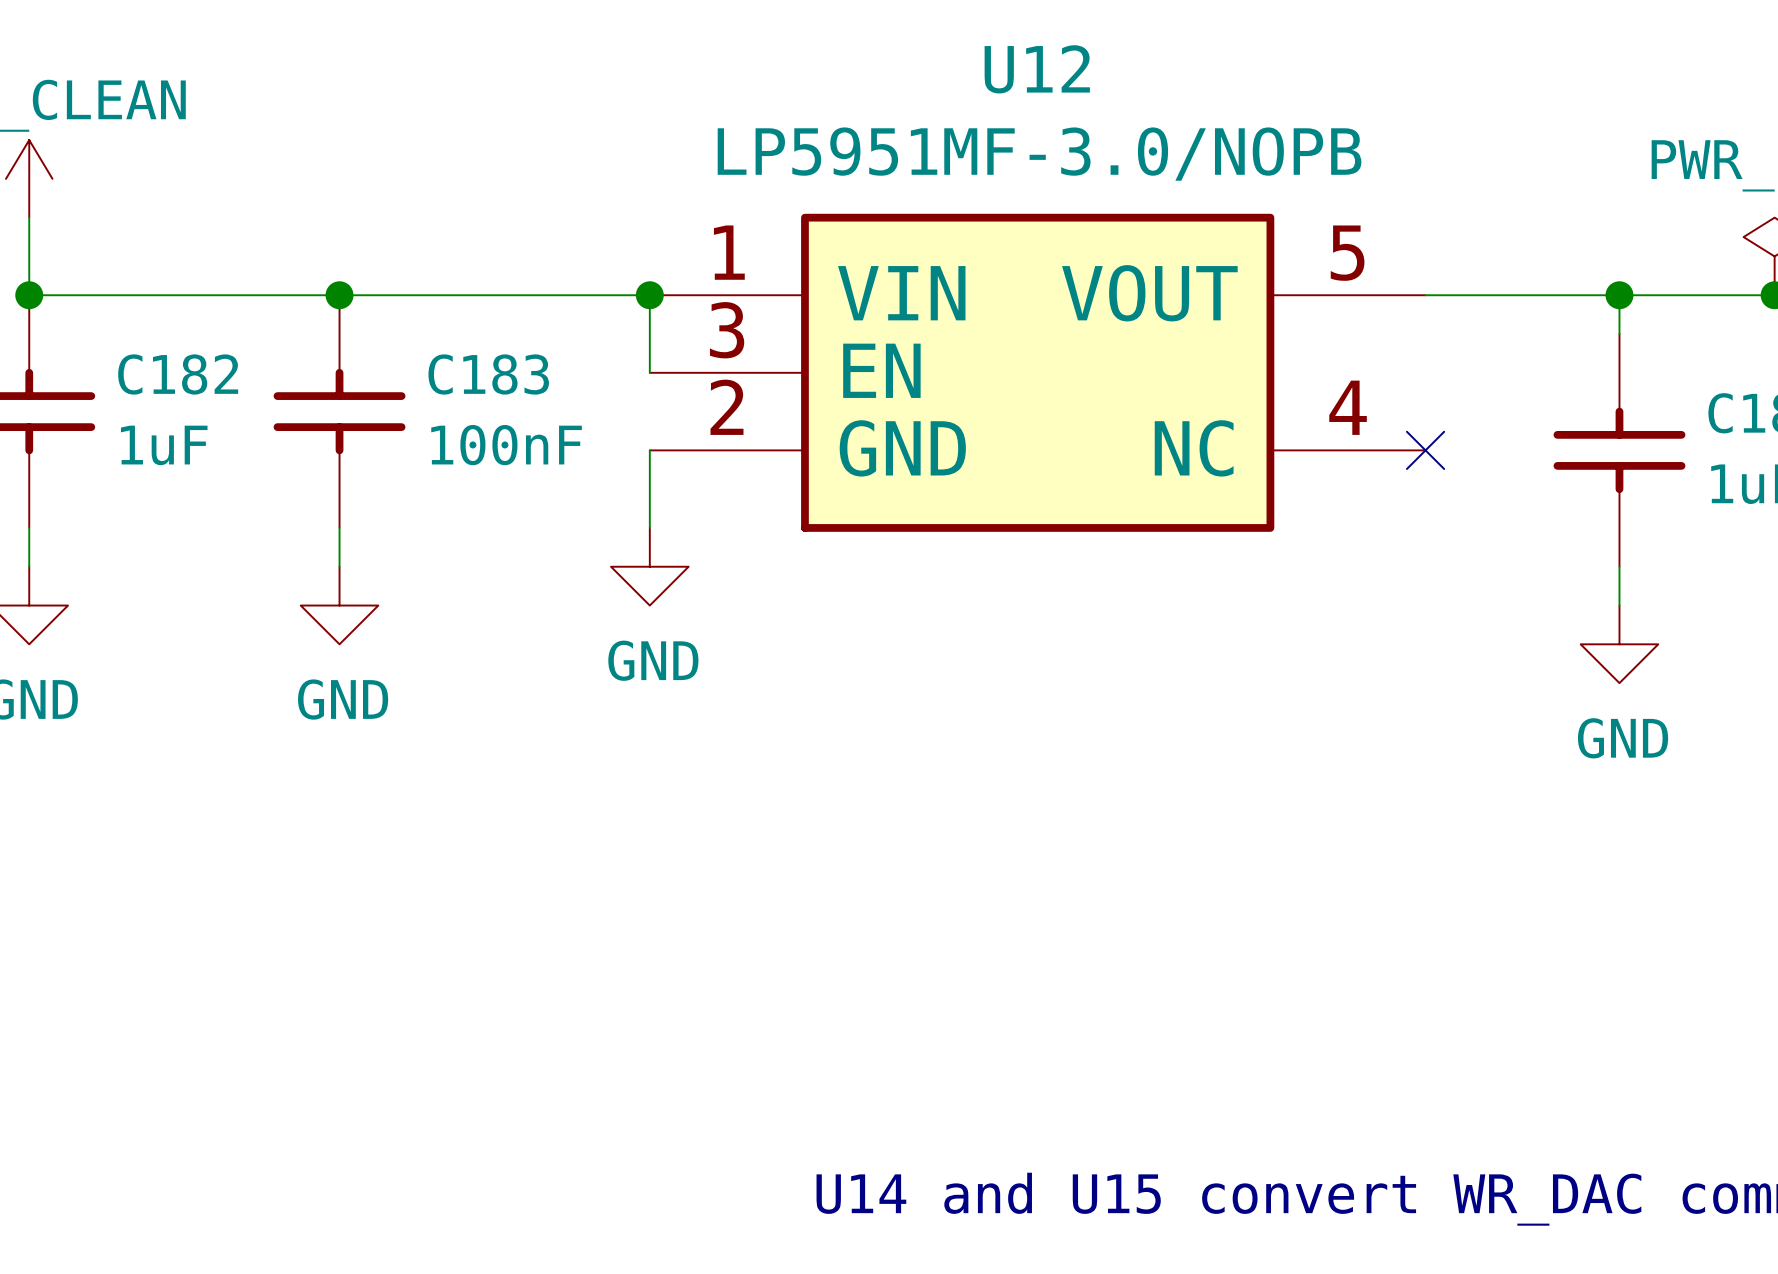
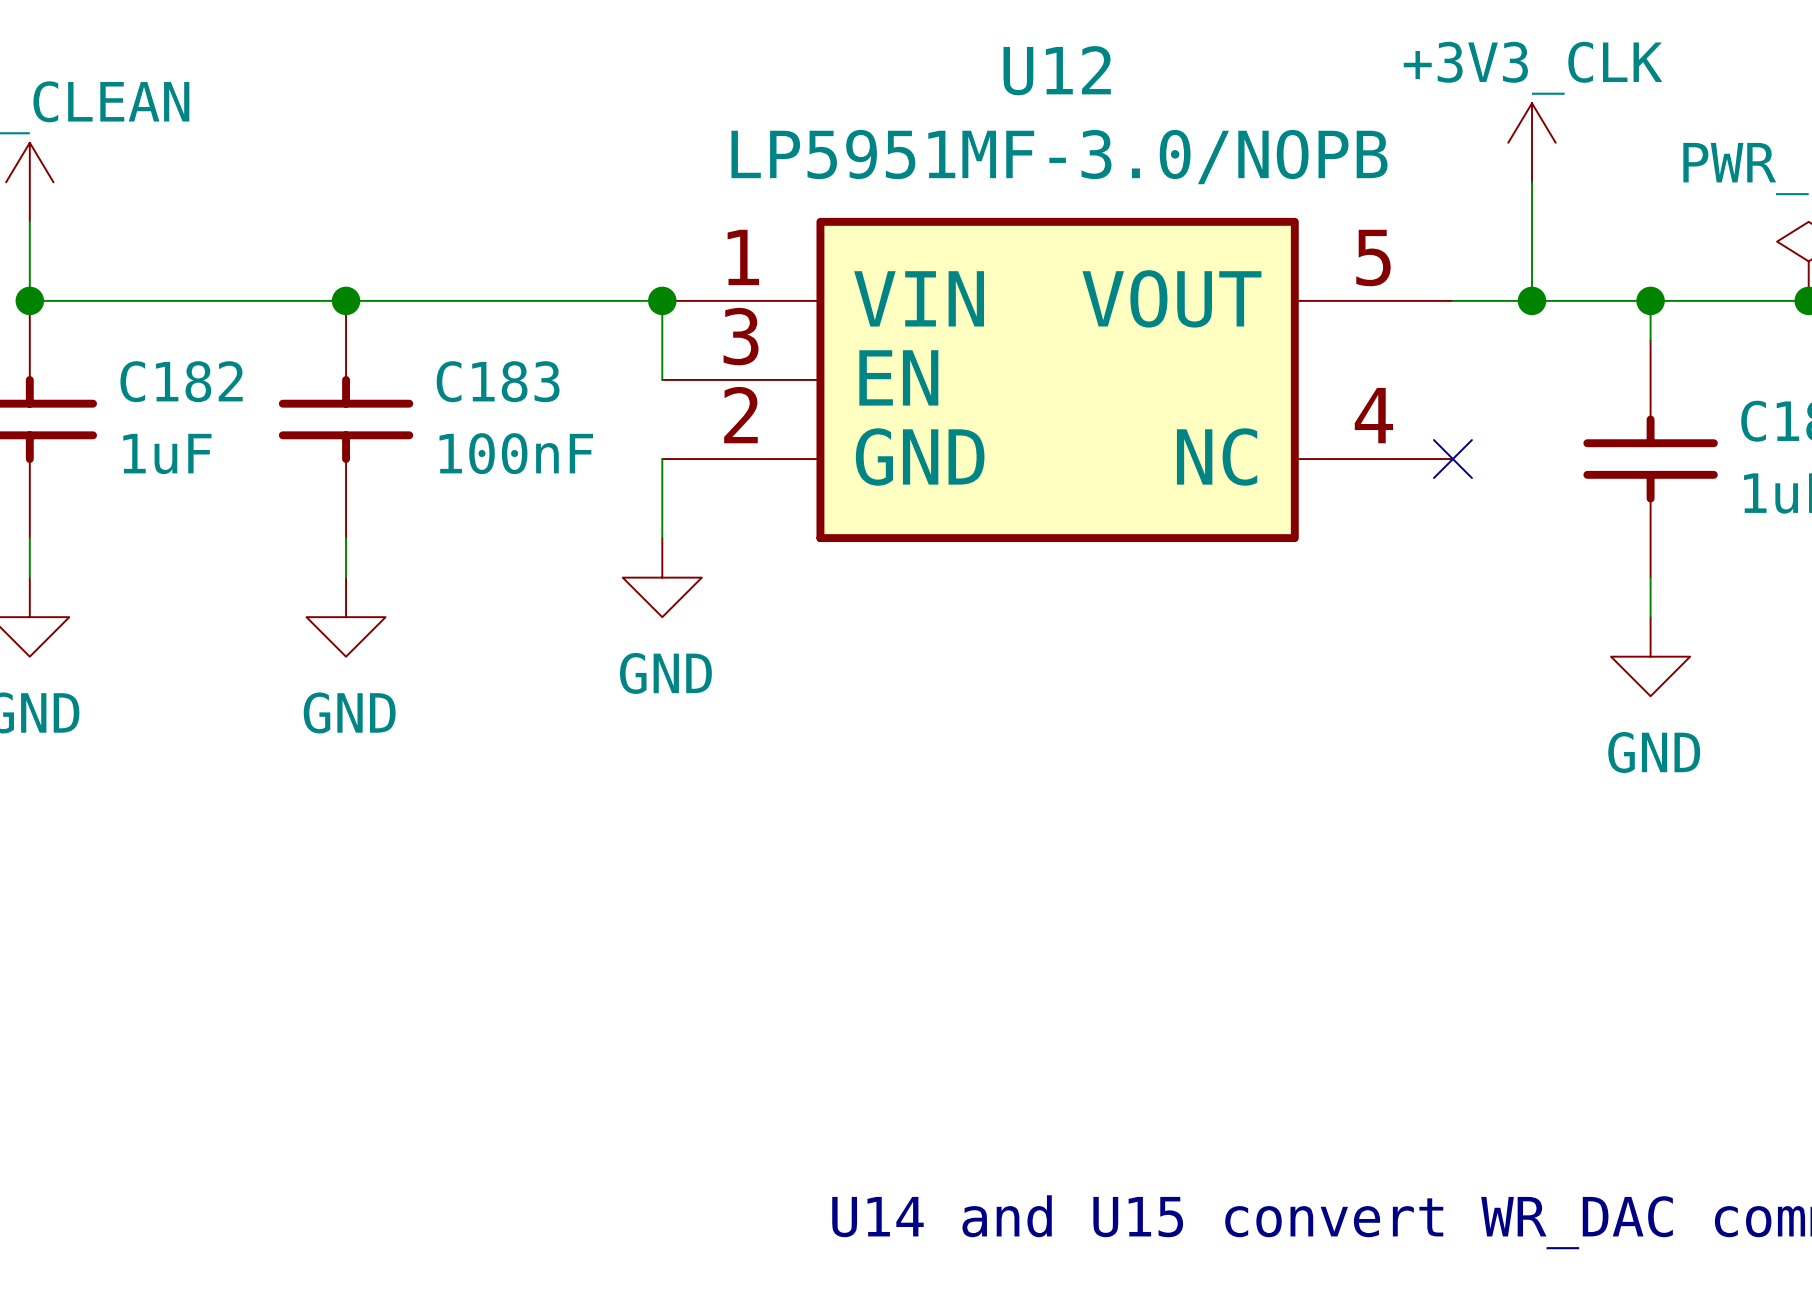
power symbol: none -> +3V3_CLK (1531, 142)
wire: none -> (1531, 182) (1531, 300)
junction: none -> (1531, 300)

